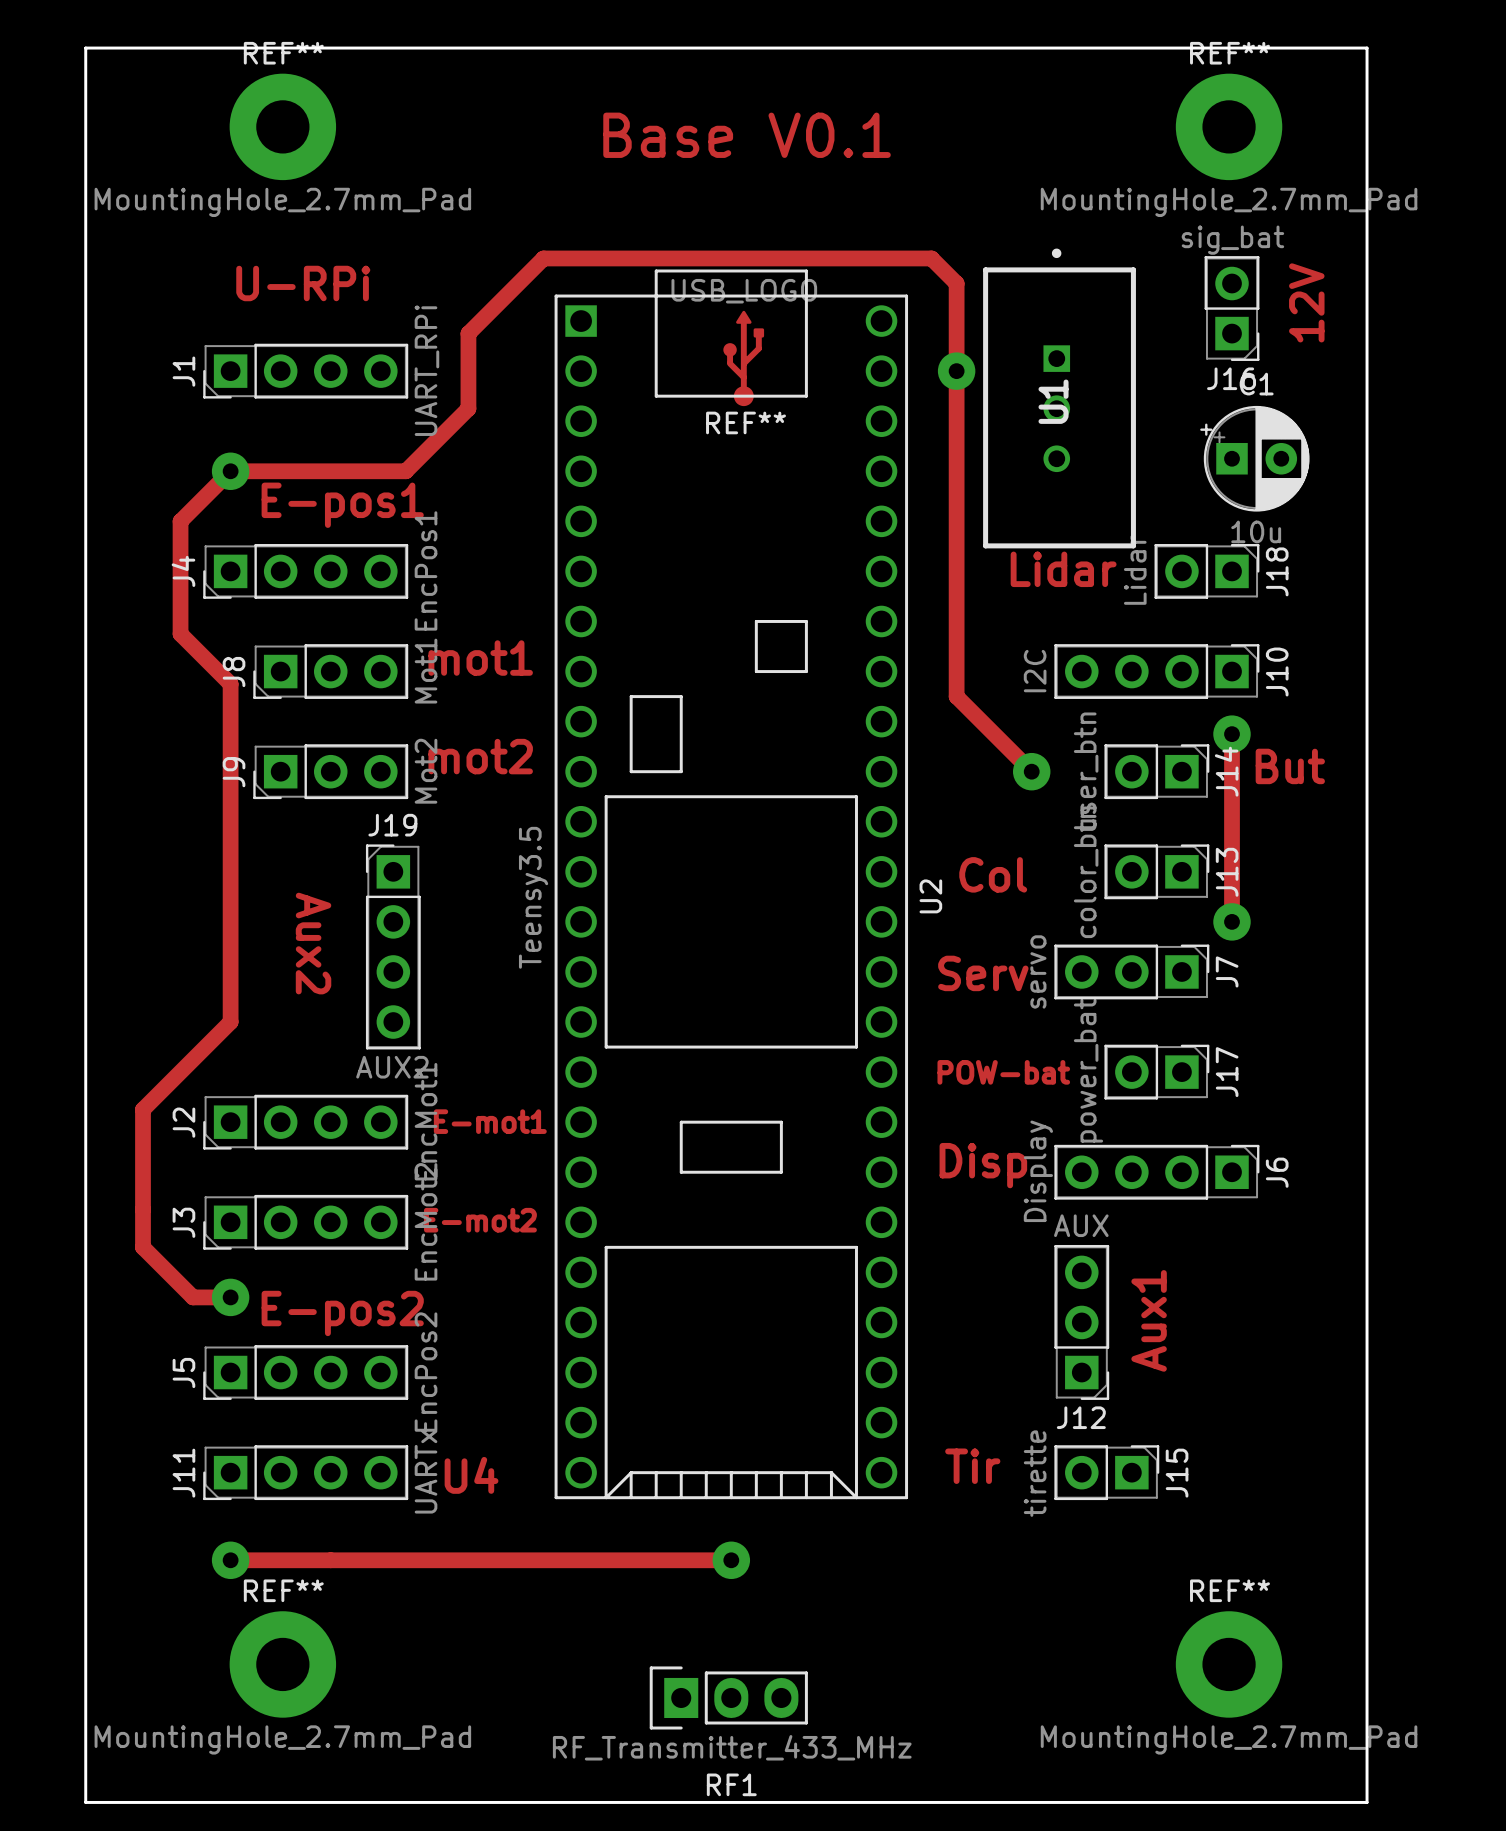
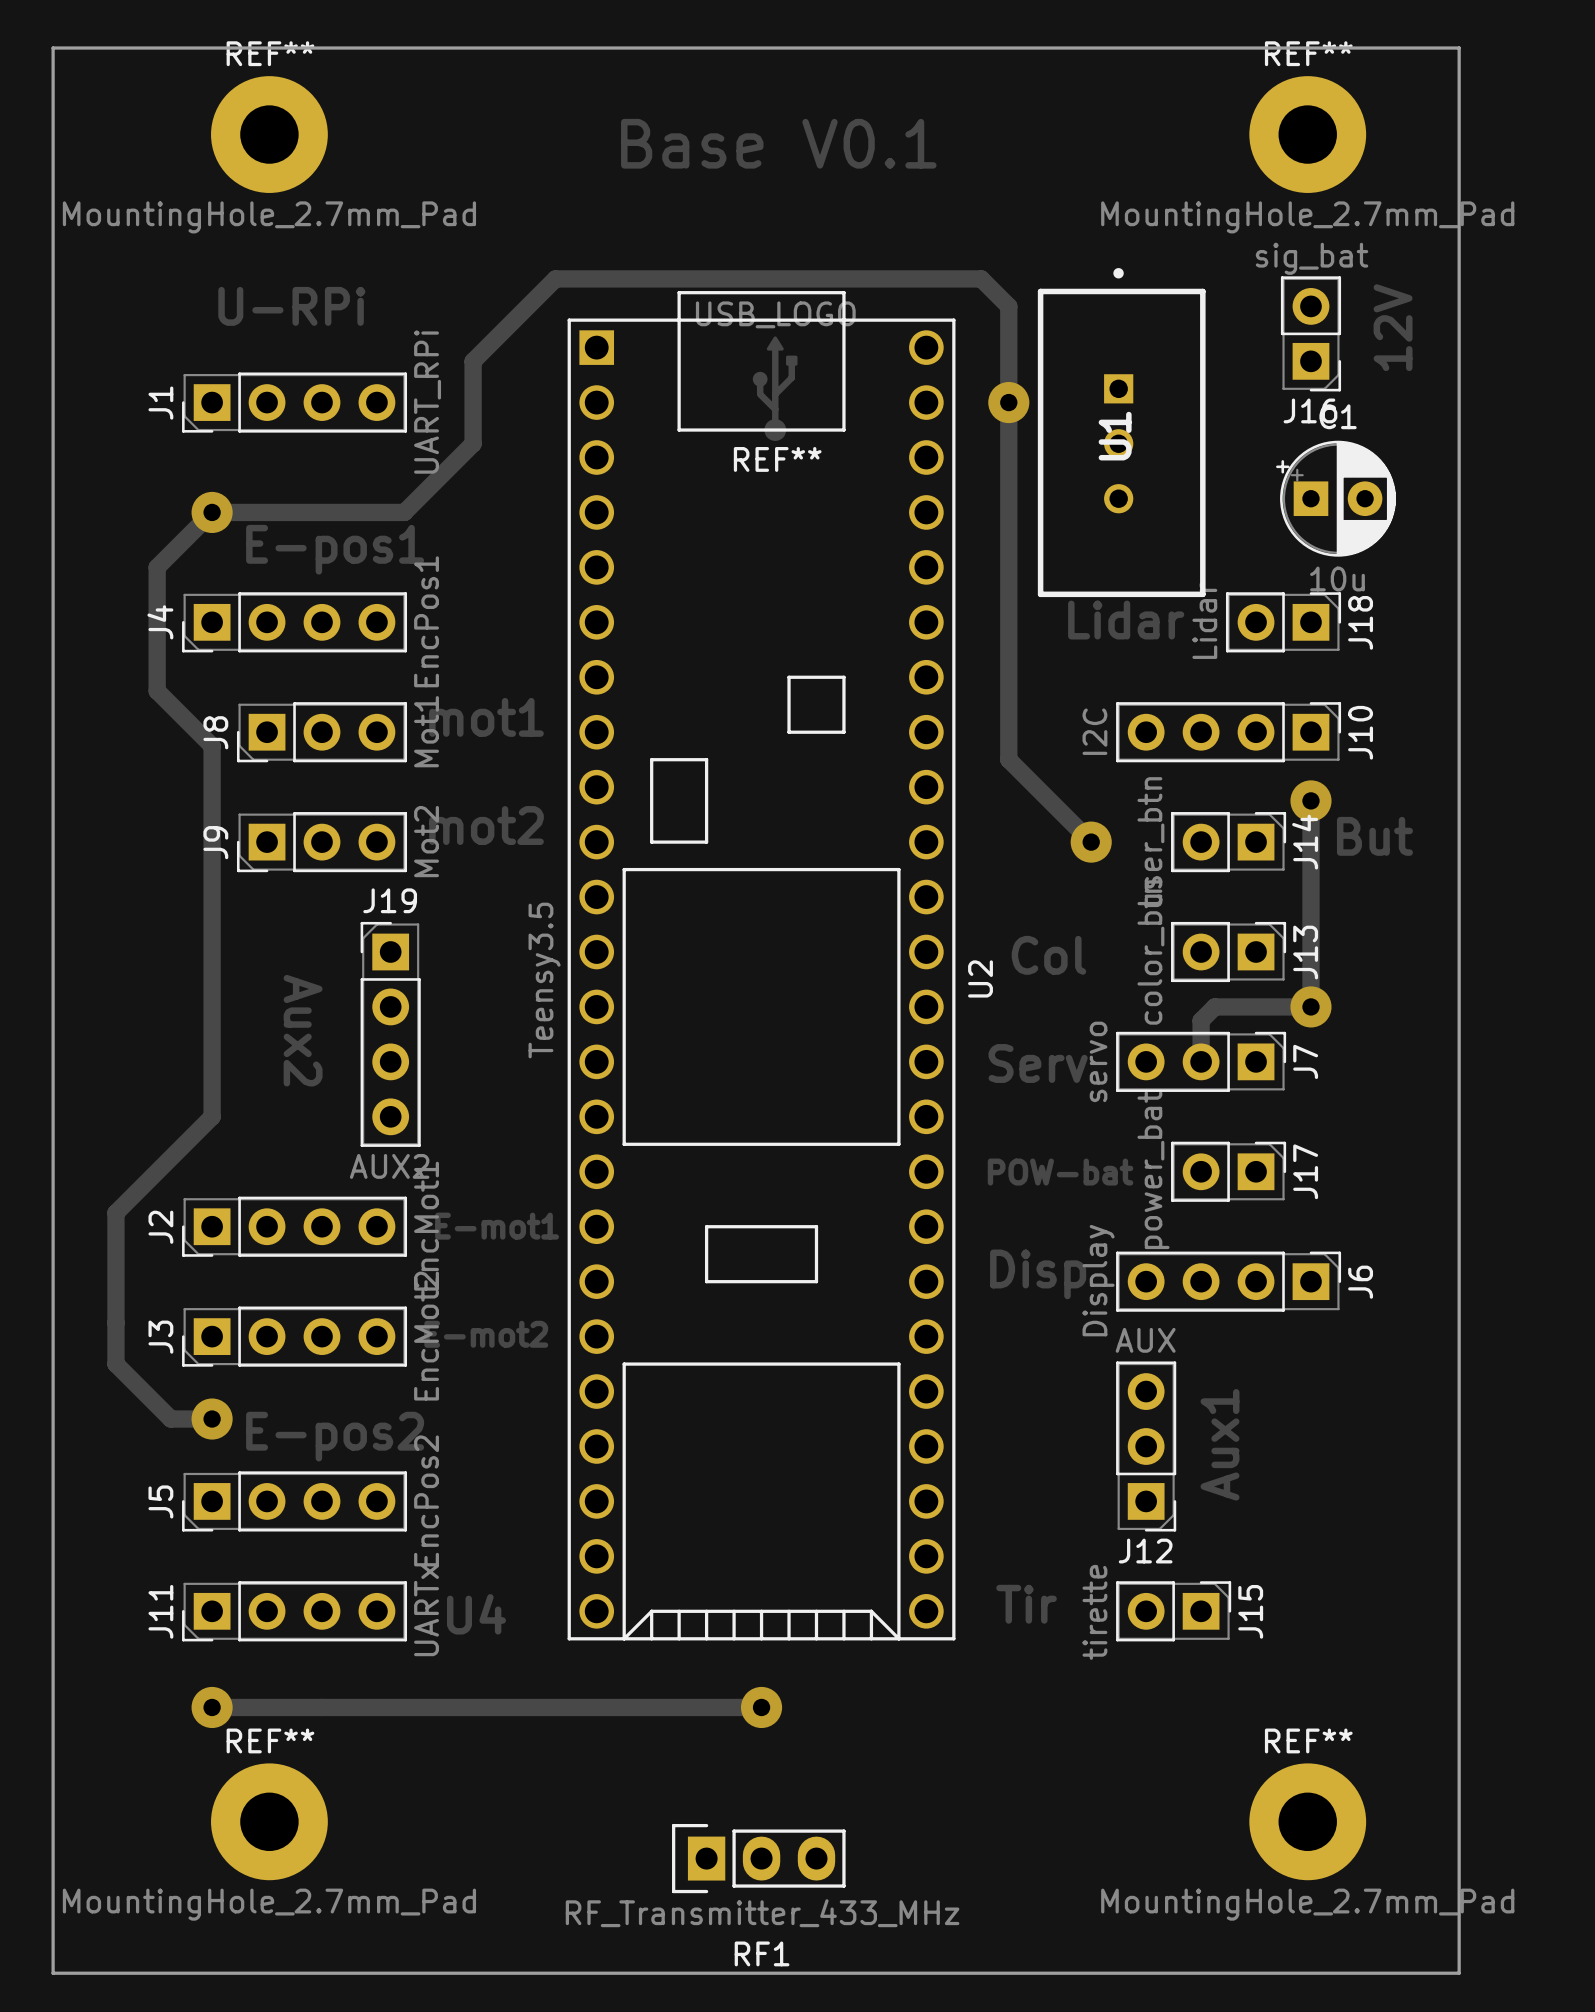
track: none -> (1310, 1006) (1214, 1006) (1201, 1020) (1201, 1061)

